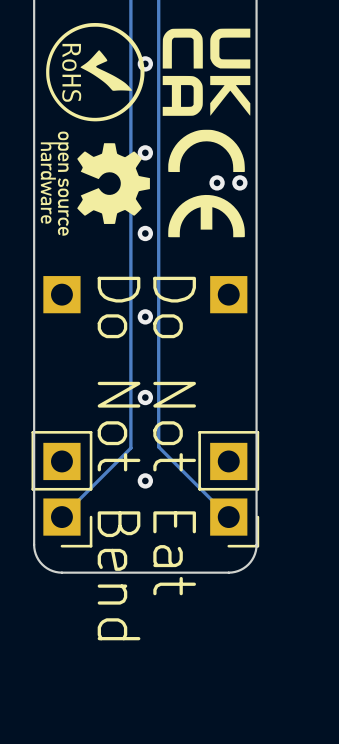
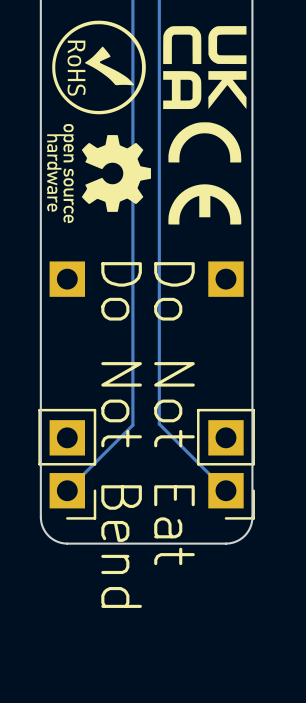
via: (145, 63) -> none
via: (145, 152) -> none
via: (217, 182) -> none
via: (239, 182) -> none
via: (145, 233) -> none
via: (145, 316) -> none
via: (145, 397) -> none
via: (145, 480) -> none

